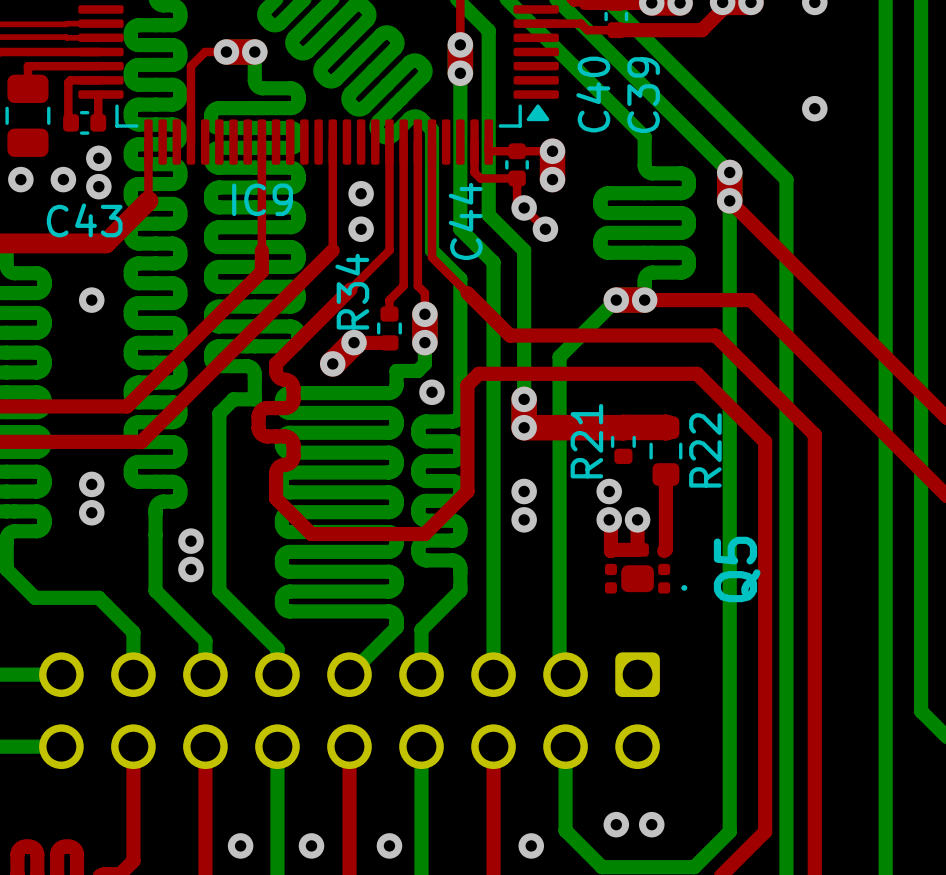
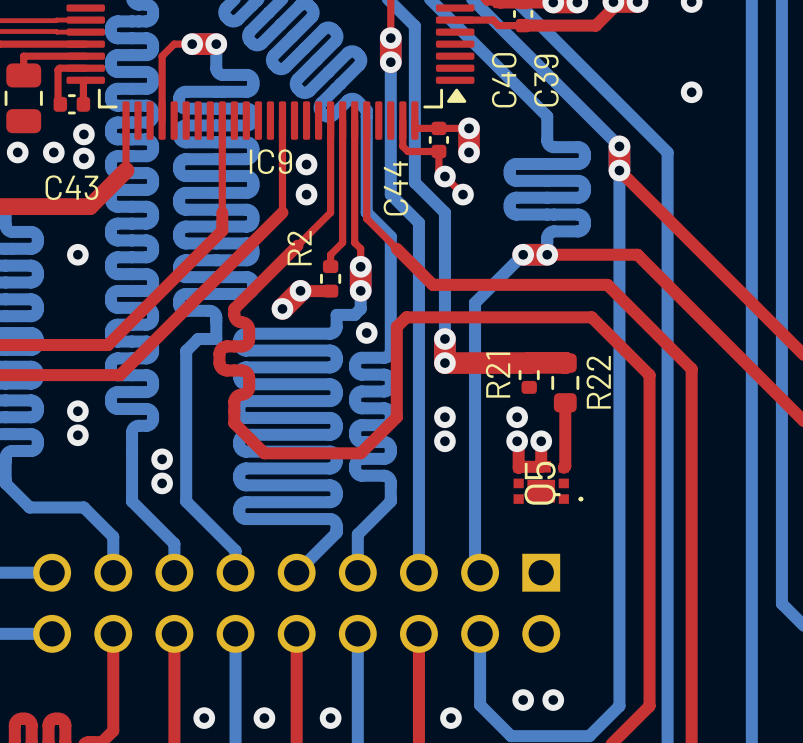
IC9 name position: IC9 (262, 199) -> IC9 (270, 161)
R34 name: R34 (352, 291) -> R2 (299, 248)
Q5 footprint: [604, 543, 688, 594] -> [513, 461, 584, 504]
Q5 name position: Q5 (737, 569) -> Q5 (542, 483)
part footprint: [39, 652, 660, 770] -> [33, 553, 561, 653]

